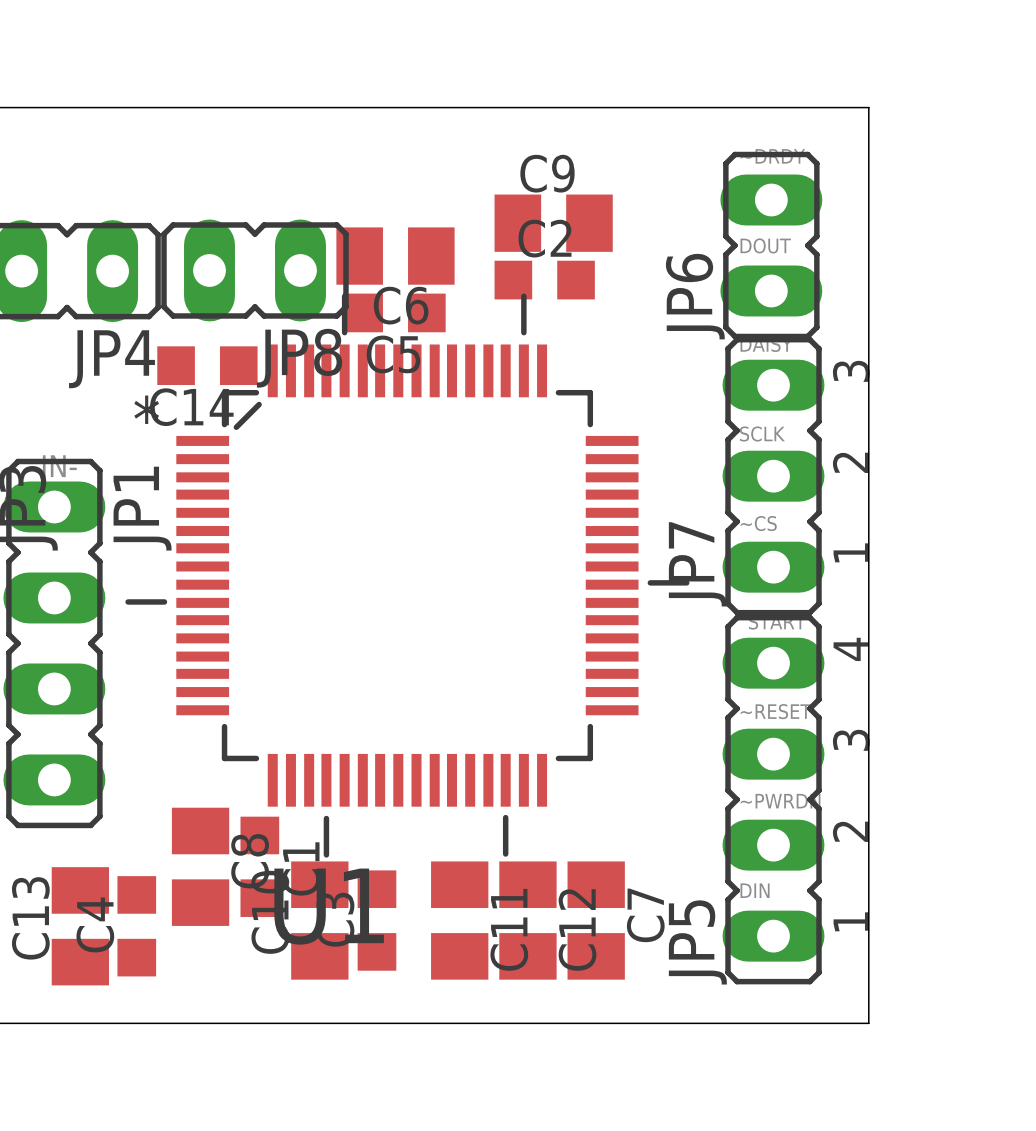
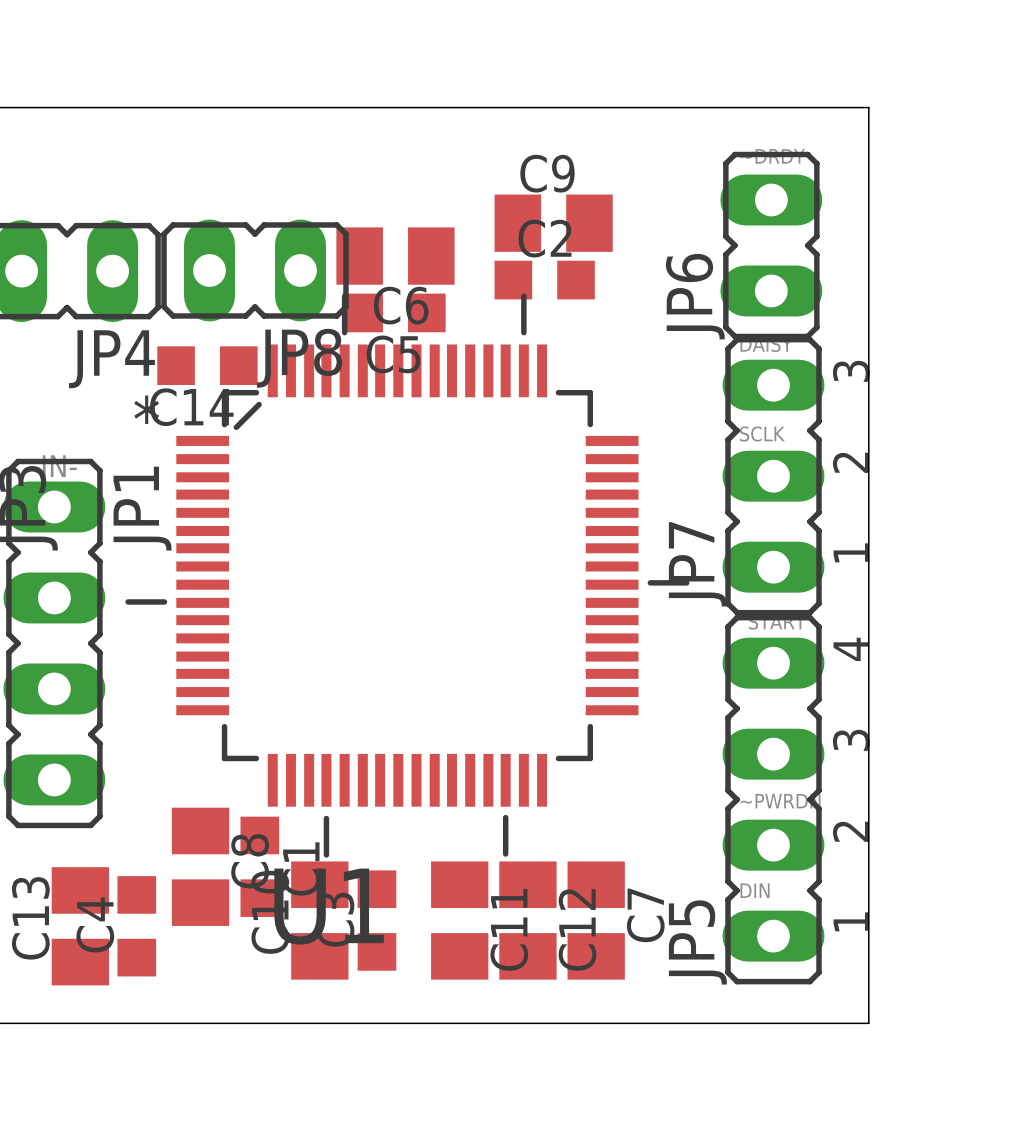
text: DOUT (765, 245) -> none
text: ~CS (758, 523) -> none
text: ~RESET (776, 711) -> none

